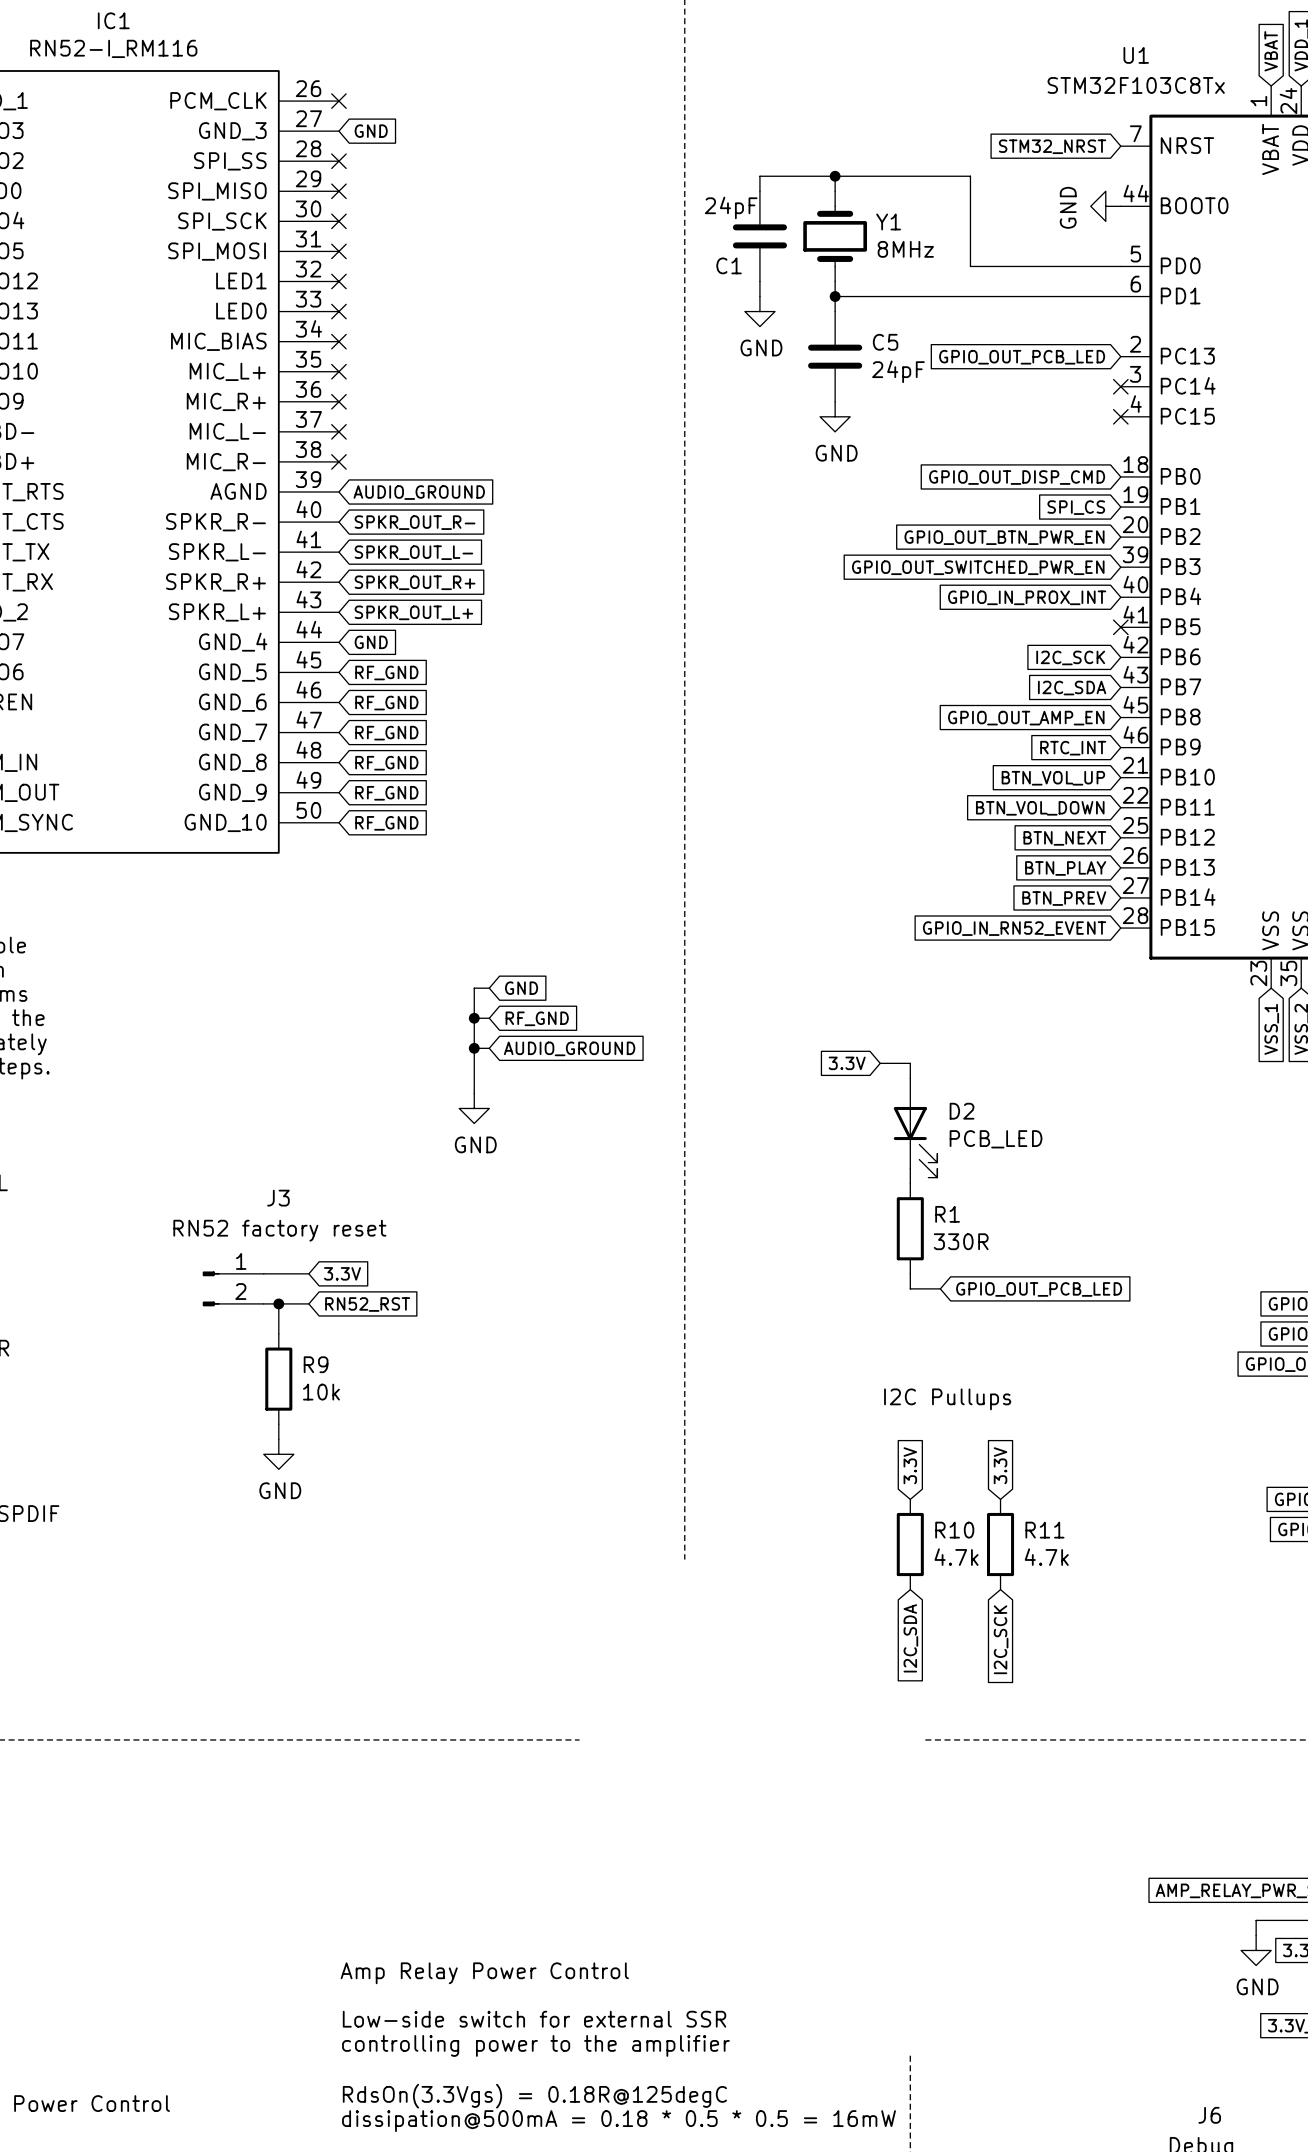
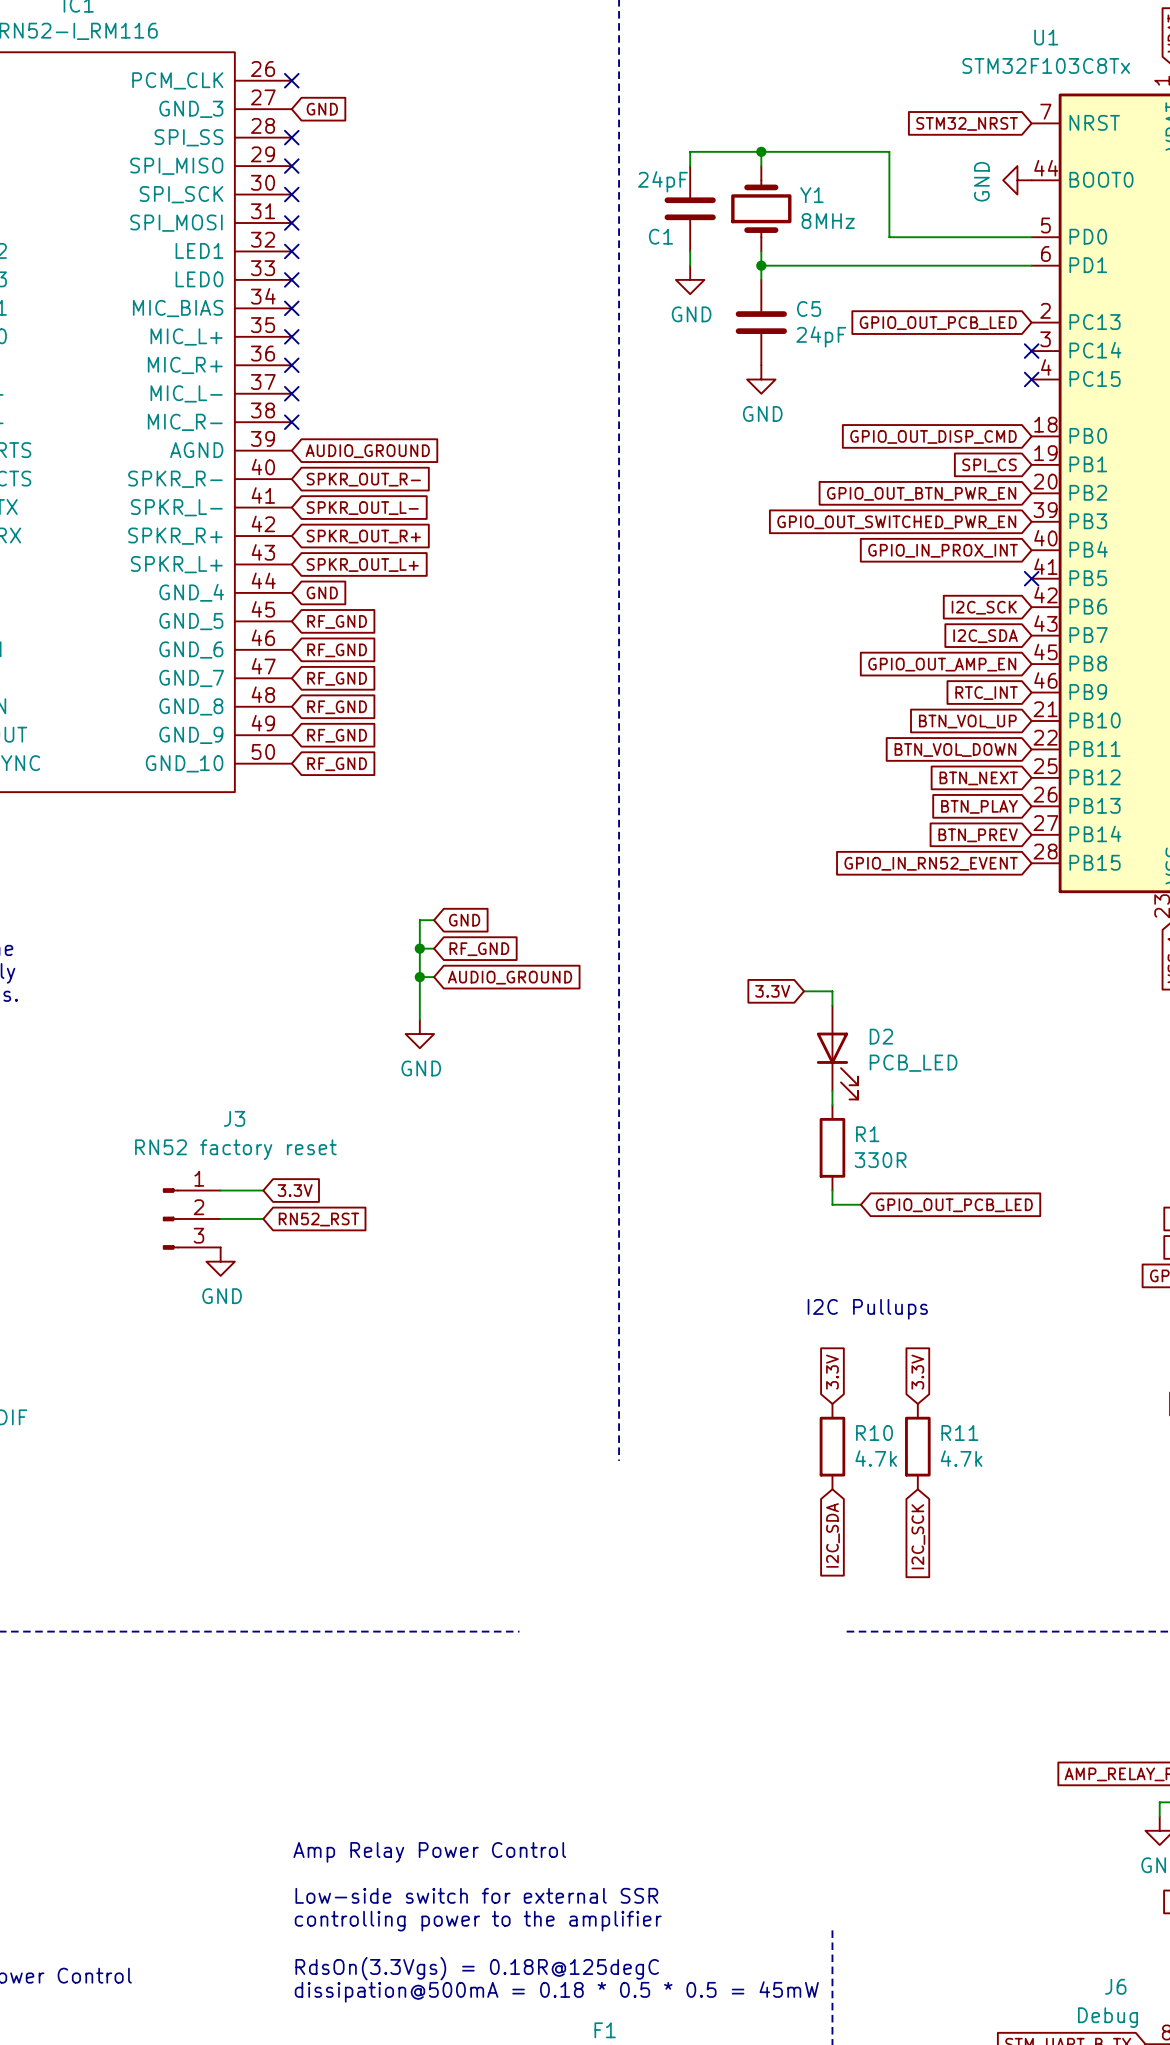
J3 symbol: [202, 1271, 264, 1307] -> [162, 1188, 221, 1250]
wire: (278, 1303) (278, 1334) -> none
junction: (278, 1303) -> none
R9: 10k (278, 1379) -> none
wire: (278, 1424) (278, 1439) -> none
power symbol position: GND (278, 1454) -> GND (220, 1261)
text: dissipation@500mA = 0.18 * 0.5 * 0.5 = 16mW (619, 2121) -> dissipation@500mA = 0.18 * 0.5 * 0.5 = 45mW (556, 1991)

